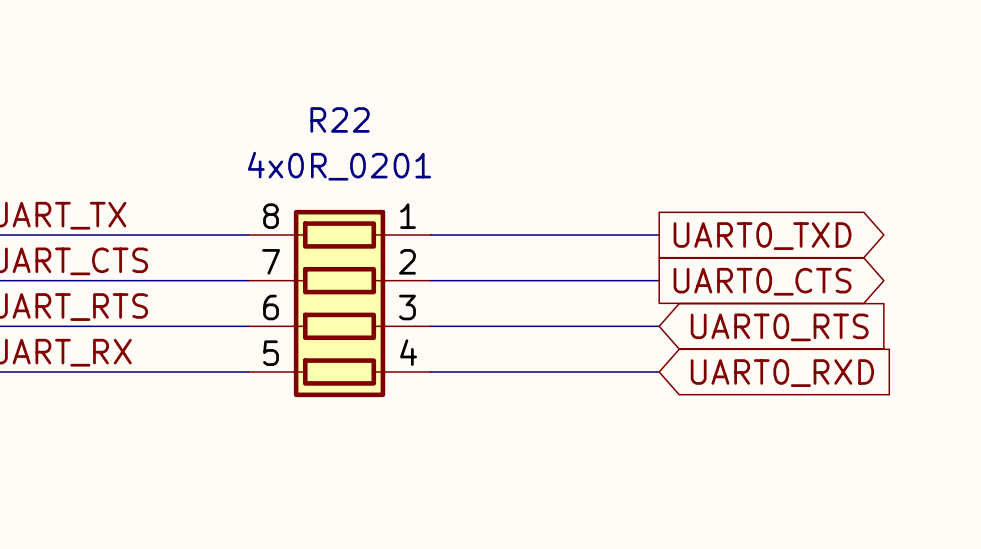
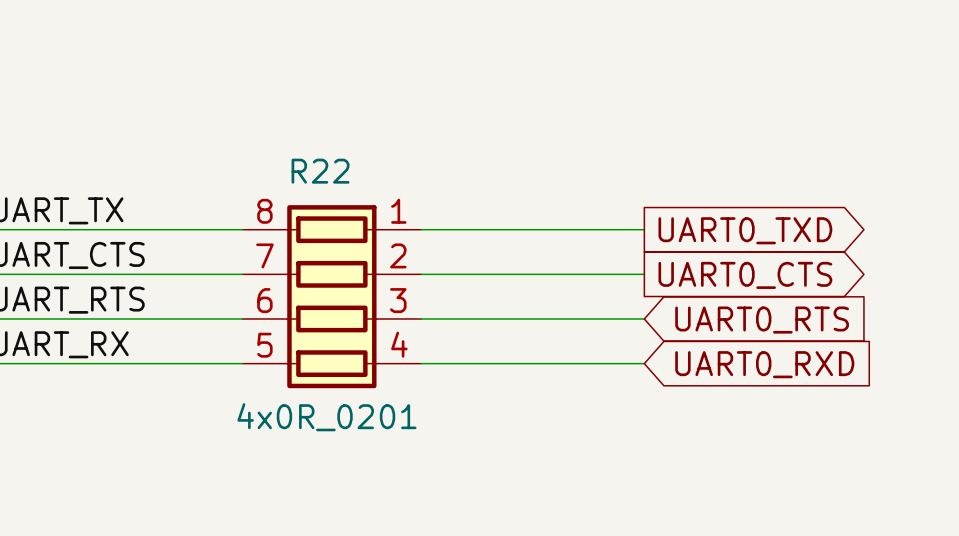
R22 name position: R22 (340, 119) -> R22 (320, 171)
R22 text position: 4x0R_0201 (339, 166) -> 4x0R_0201 (326, 417)

